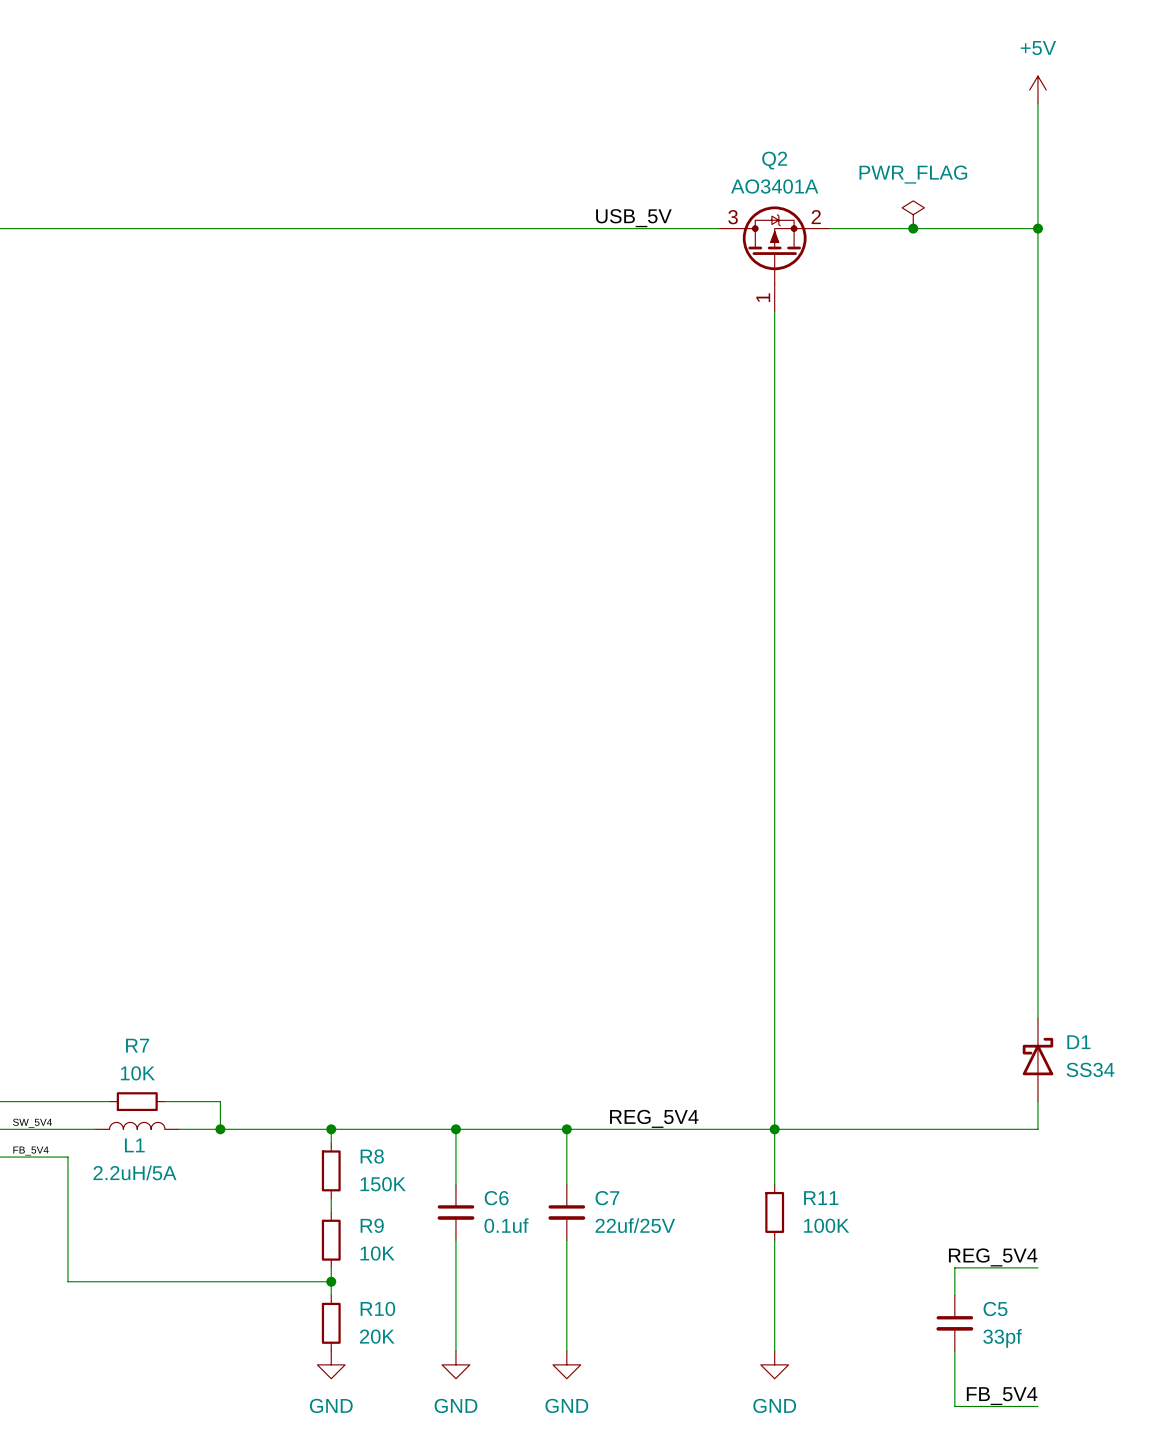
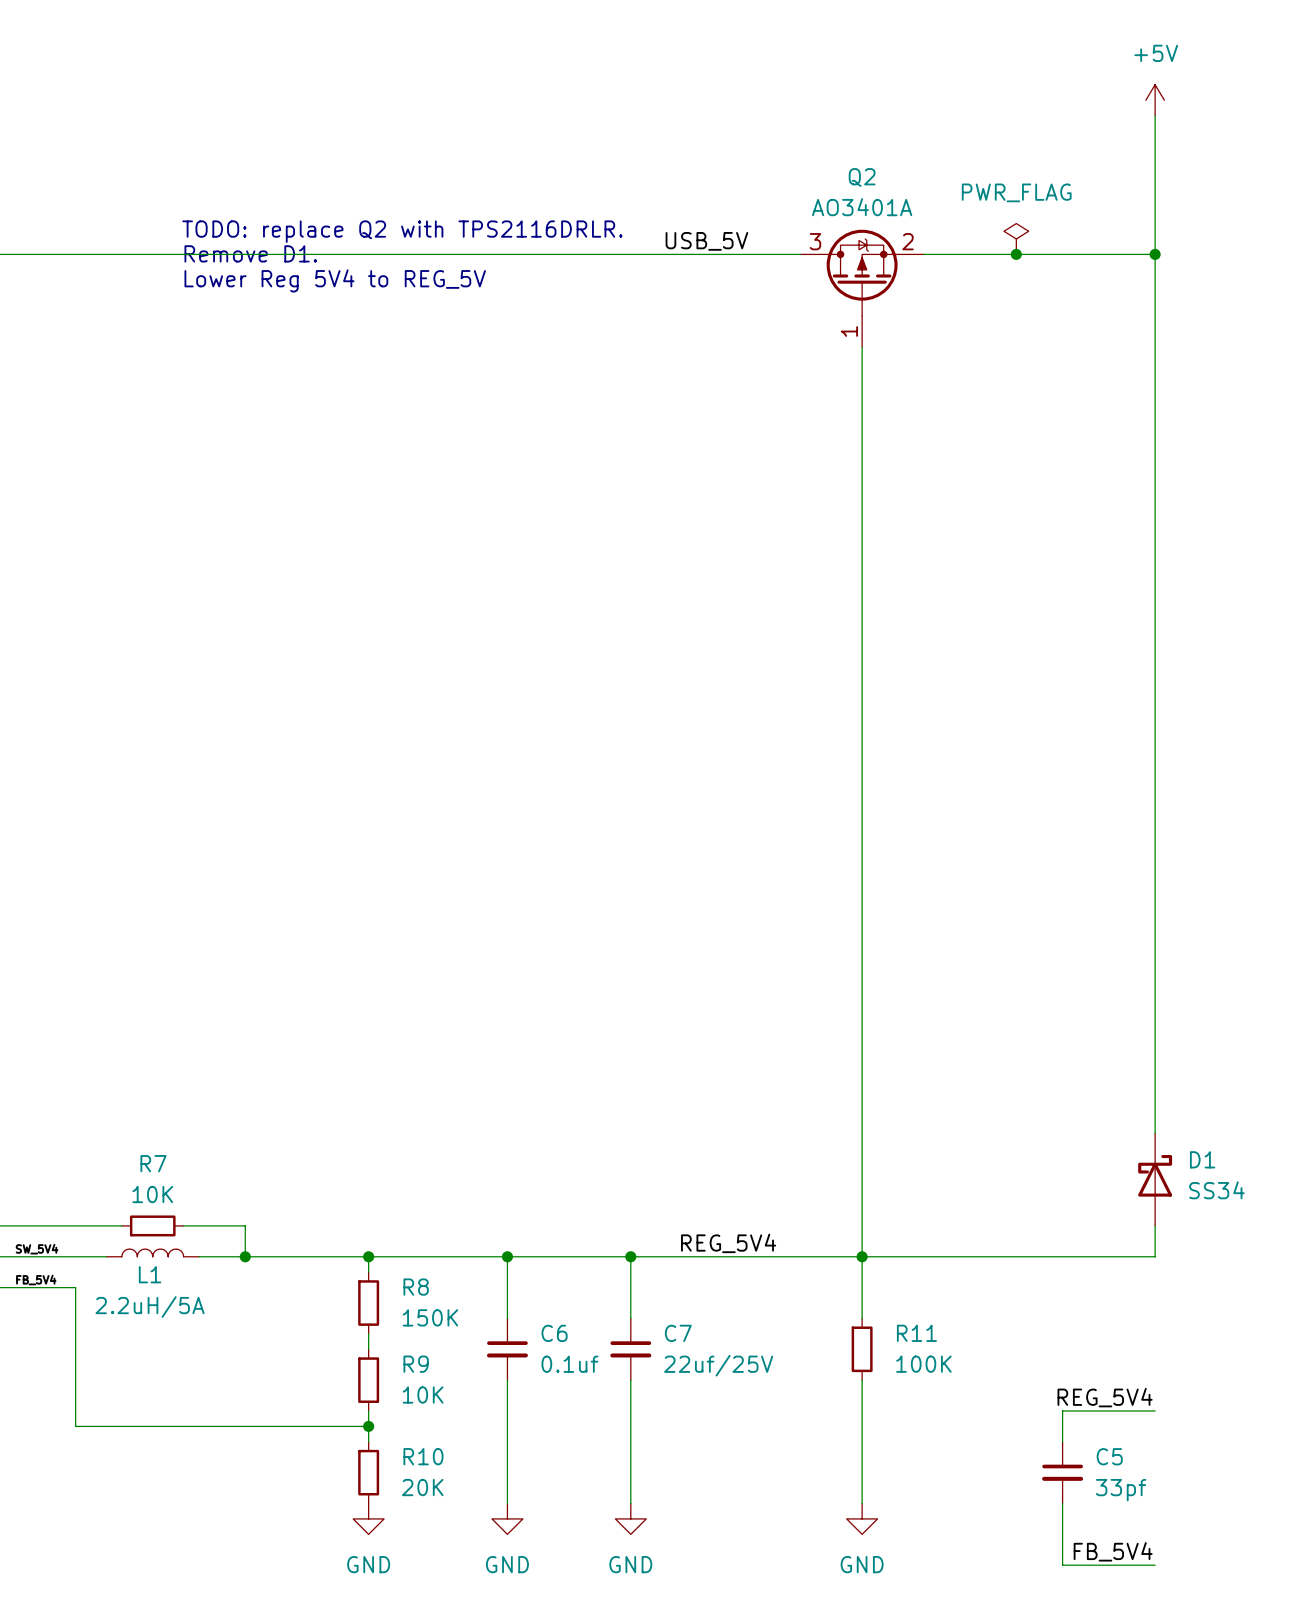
text: none -> TODO: replace Q2 with TPS2116DRLR. (402, 231)
text: none -> Remove D1. (250, 253)
text: none -> Lower Reg 5V4 to REG_5V (335, 280)

